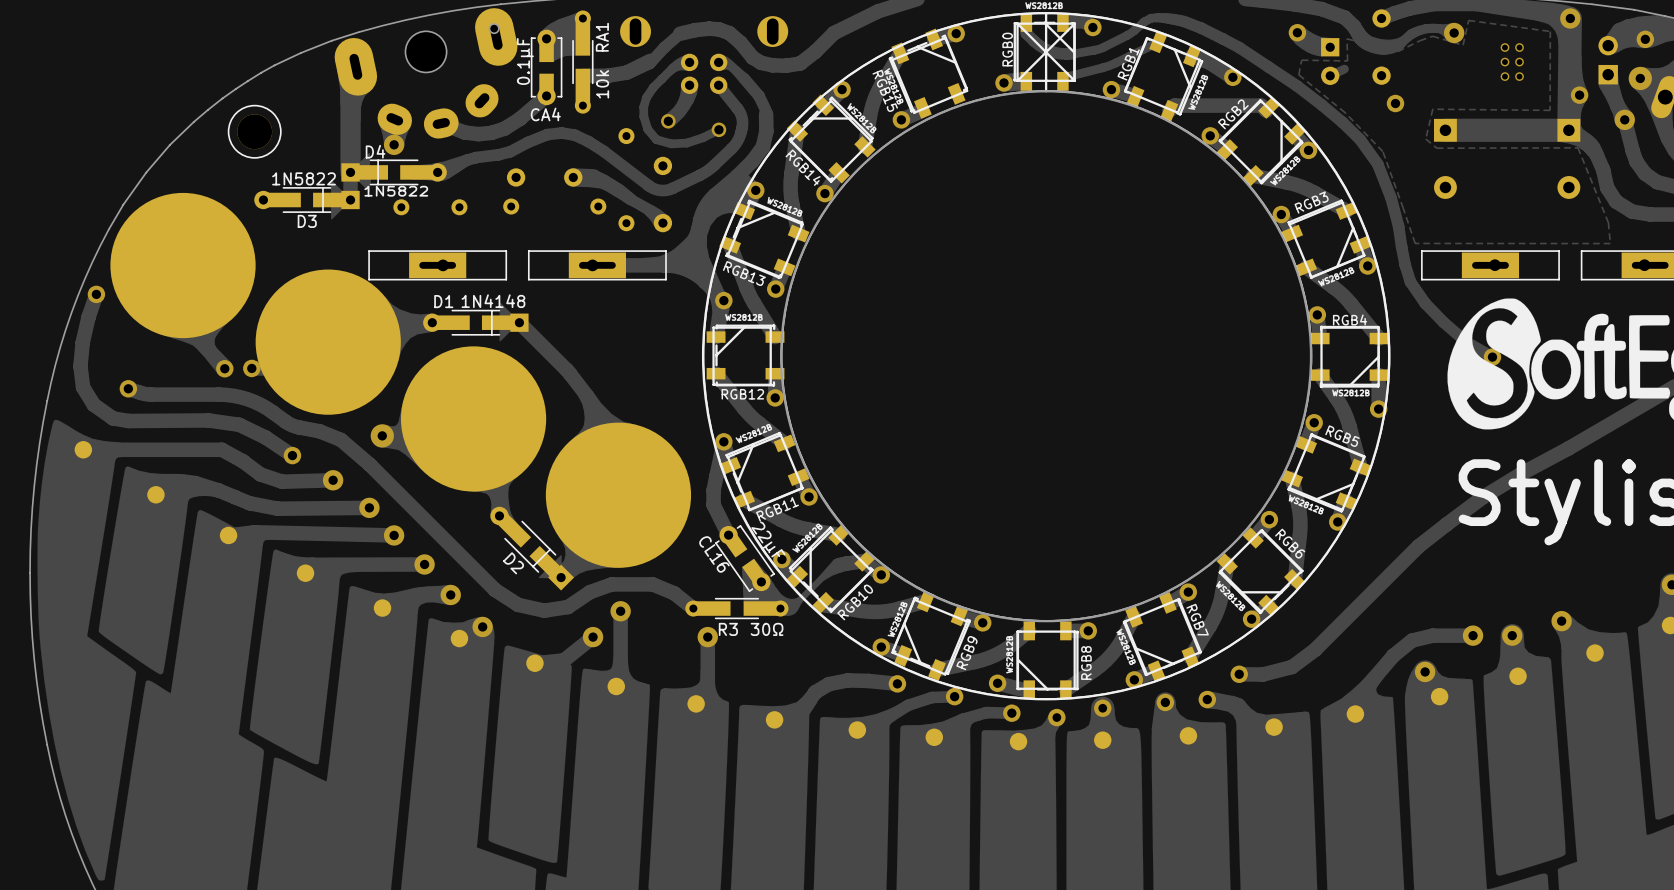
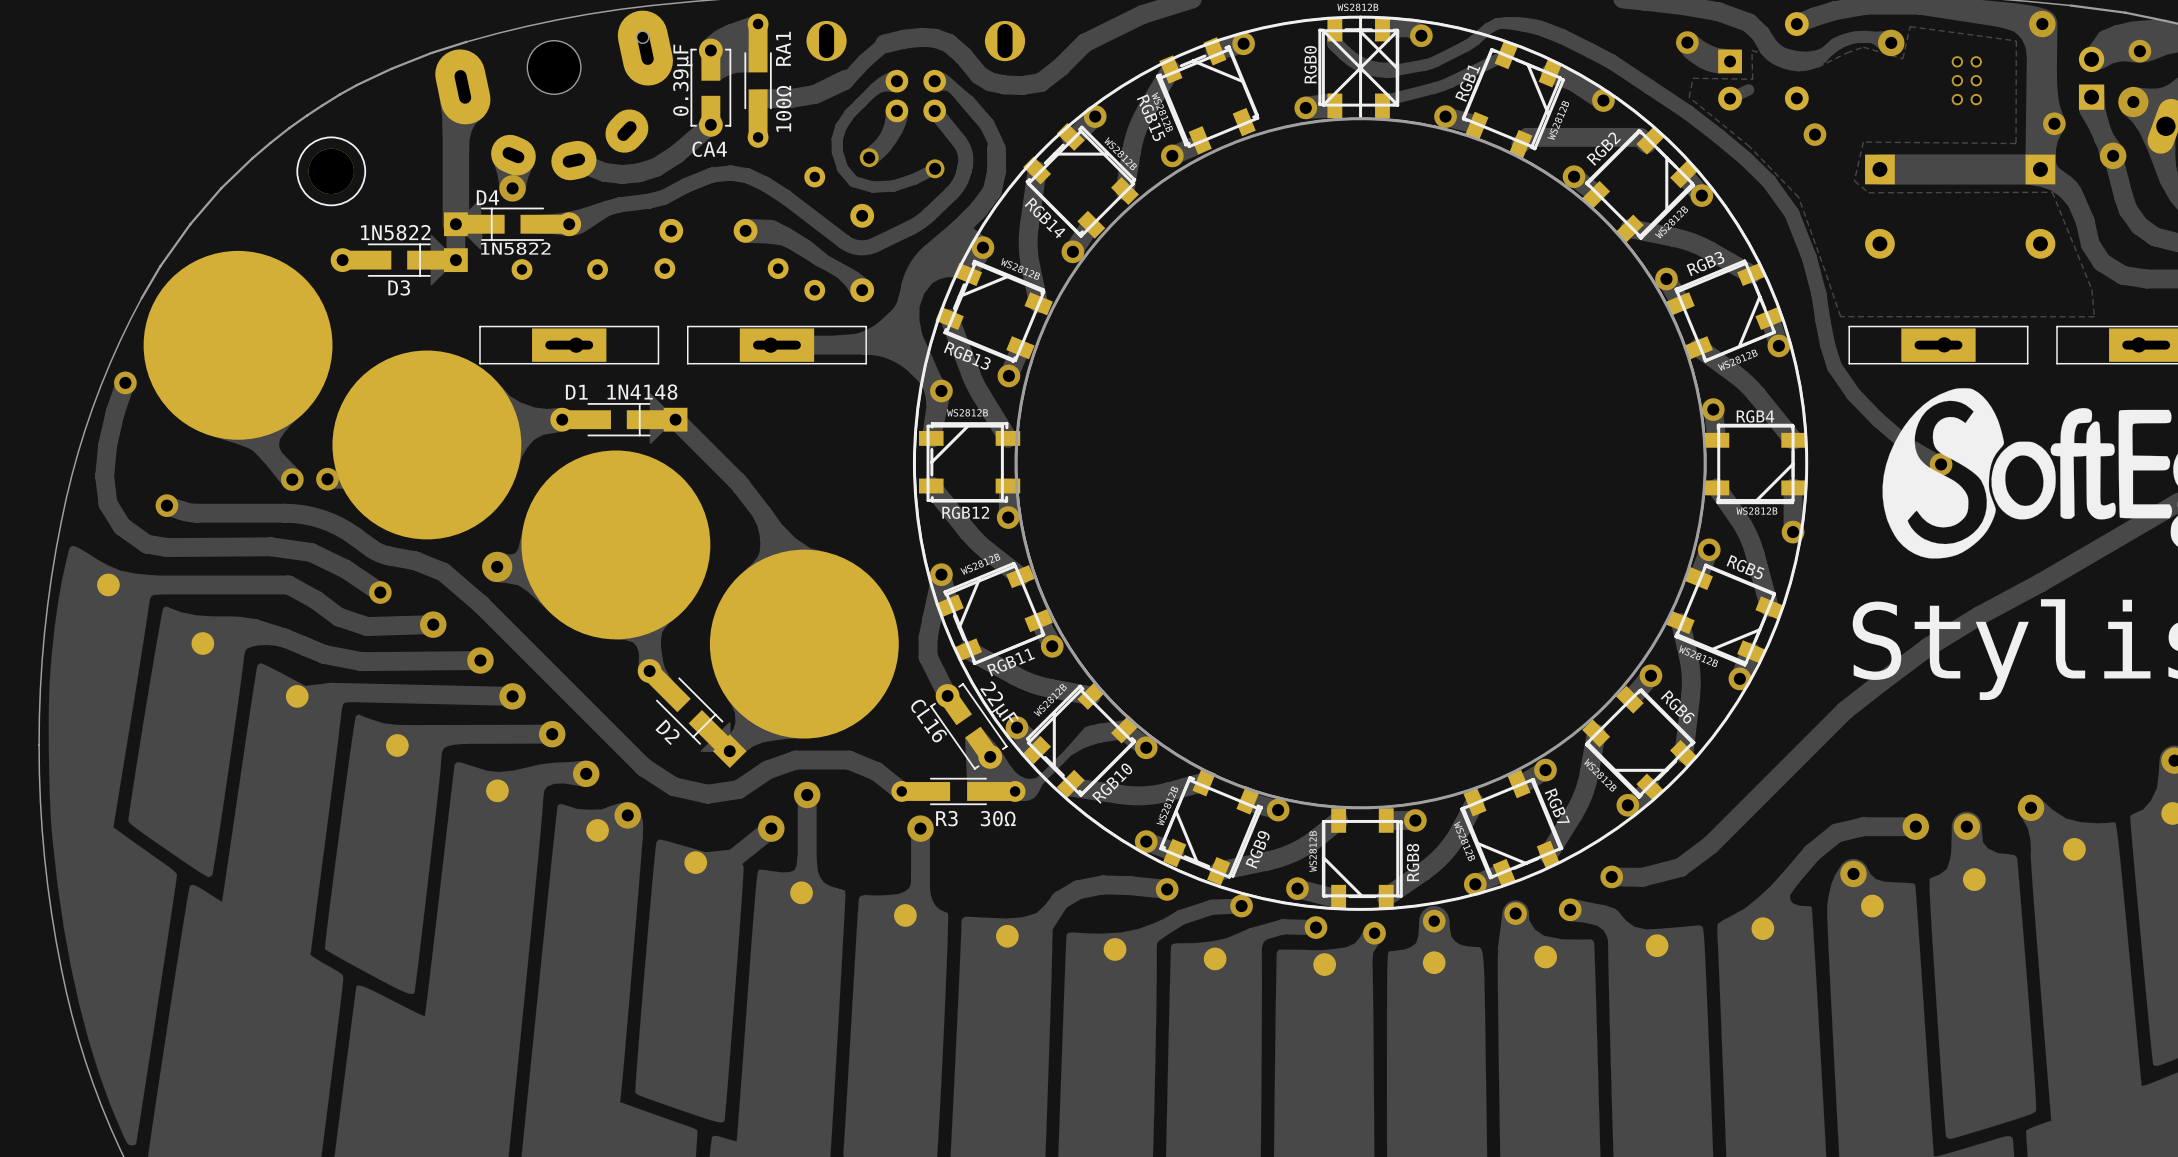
CA4 value: 0.1μF (525, 61) -> 0.39μF (682, 80)
RA1 value: 10k (602, 84) -> 100Ω (783, 108)

